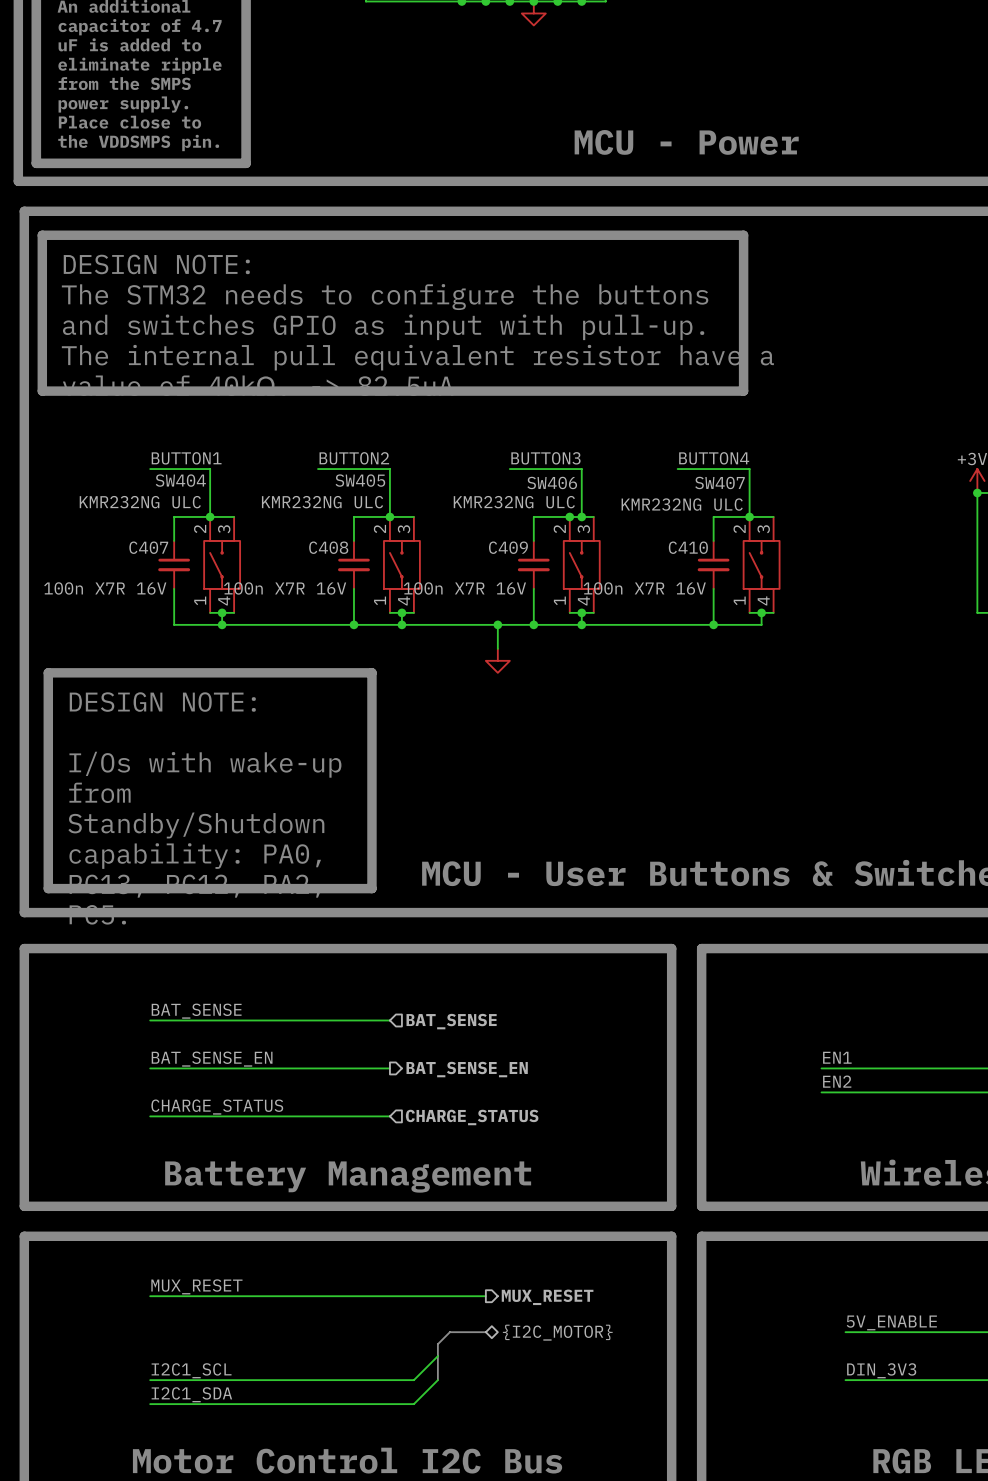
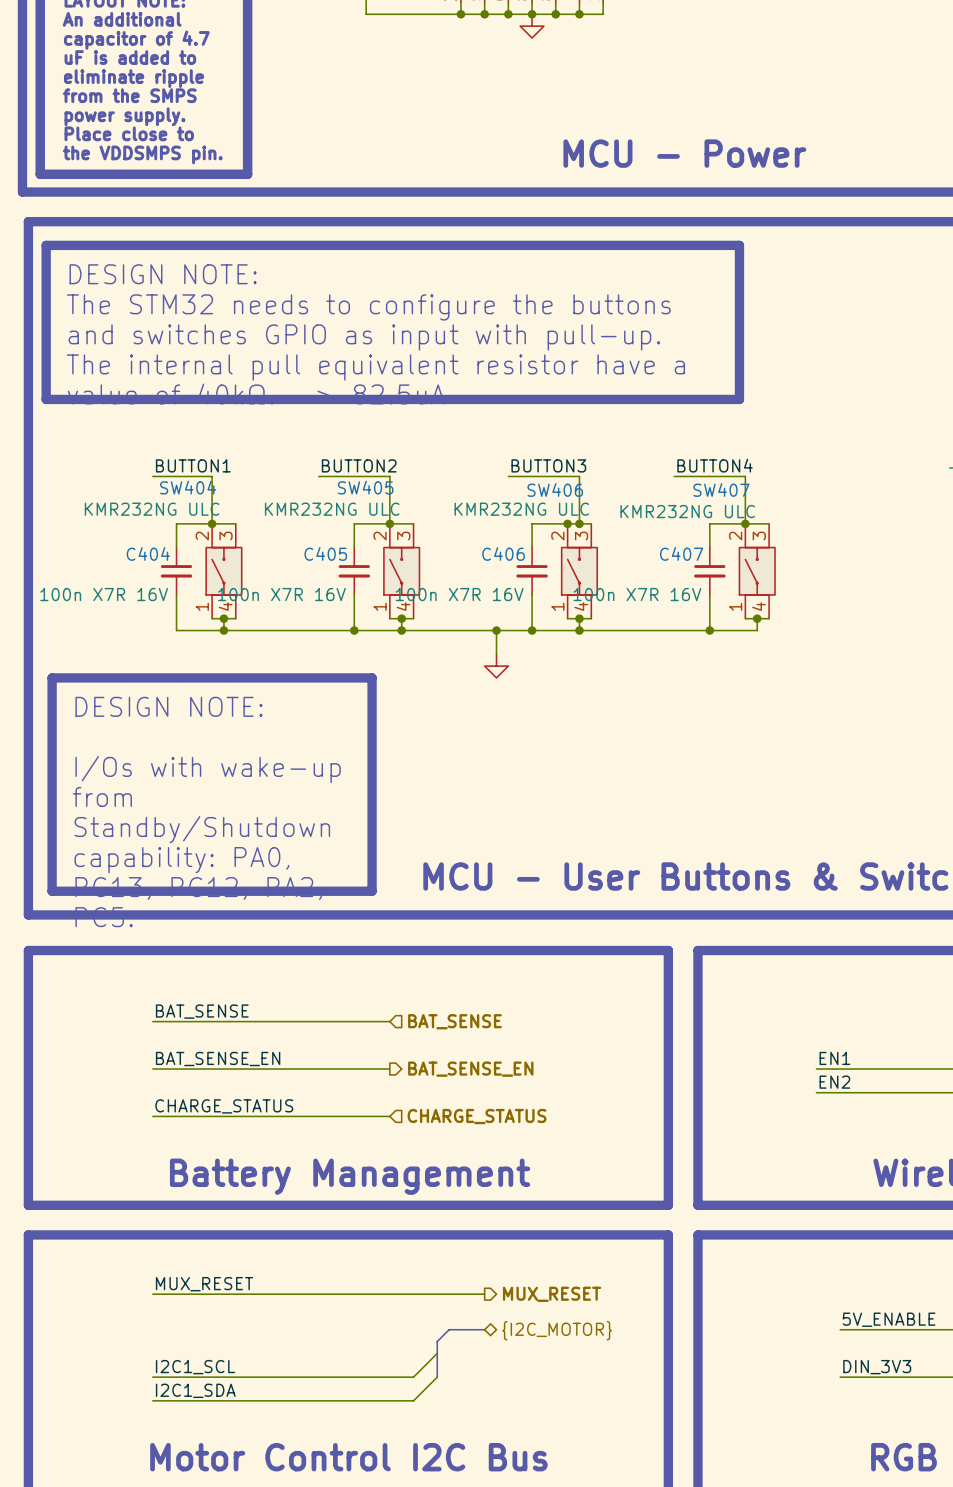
C407 name: C407 (148, 547) -> C404 (148, 553)
C408 name: C408 (328, 547) -> C405 (325, 553)
C409 name: C409 (508, 547) -> C406 (503, 553)
C410 name: C410 (688, 547) -> C407 (681, 553)

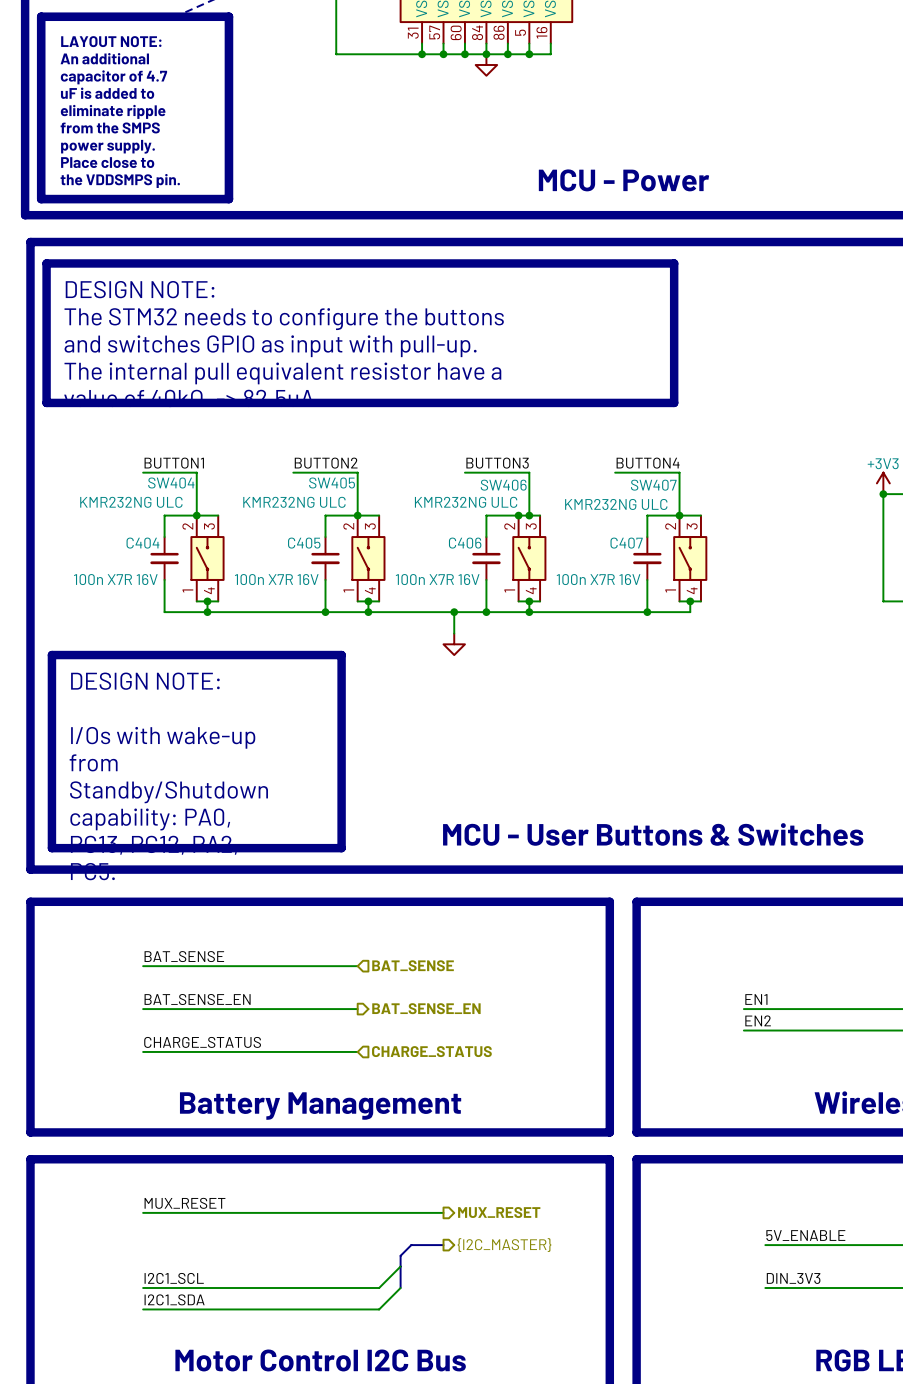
hierarchical label shape: bidirectional (557, 1330) -> output (504, 1245)
hierarchical label: {I2C_MOTOR} (557, 1330) -> {I2C_MASTER} (504, 1245)

